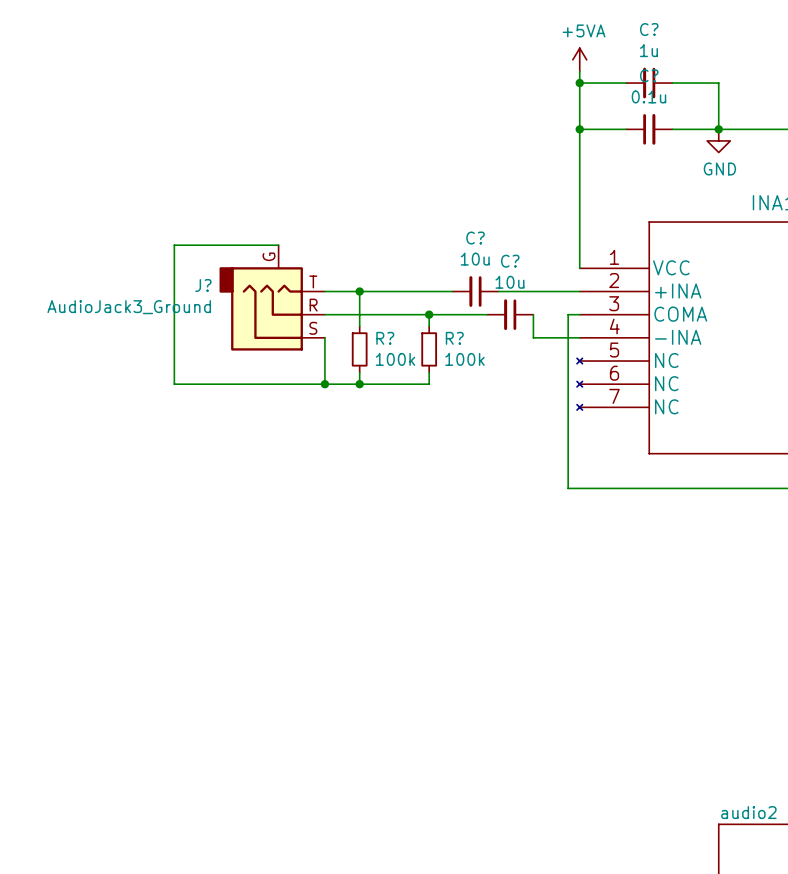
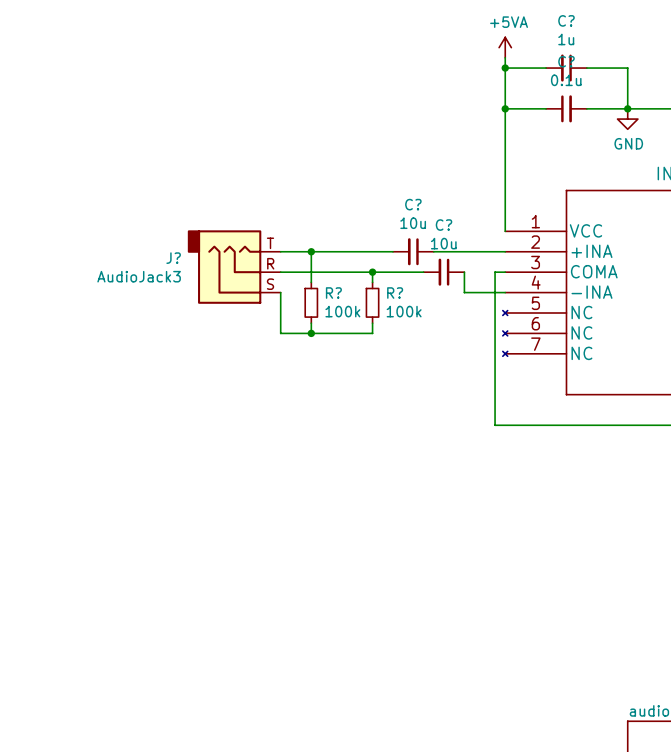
wire: (278, 245) (174, 245) (174, 384) (324, 384) -> none
J?: AudioJack3_Ground (272, 297) -> none
J?: none -> AudioJack3 (234, 267)
junction: (324, 384) -> none

